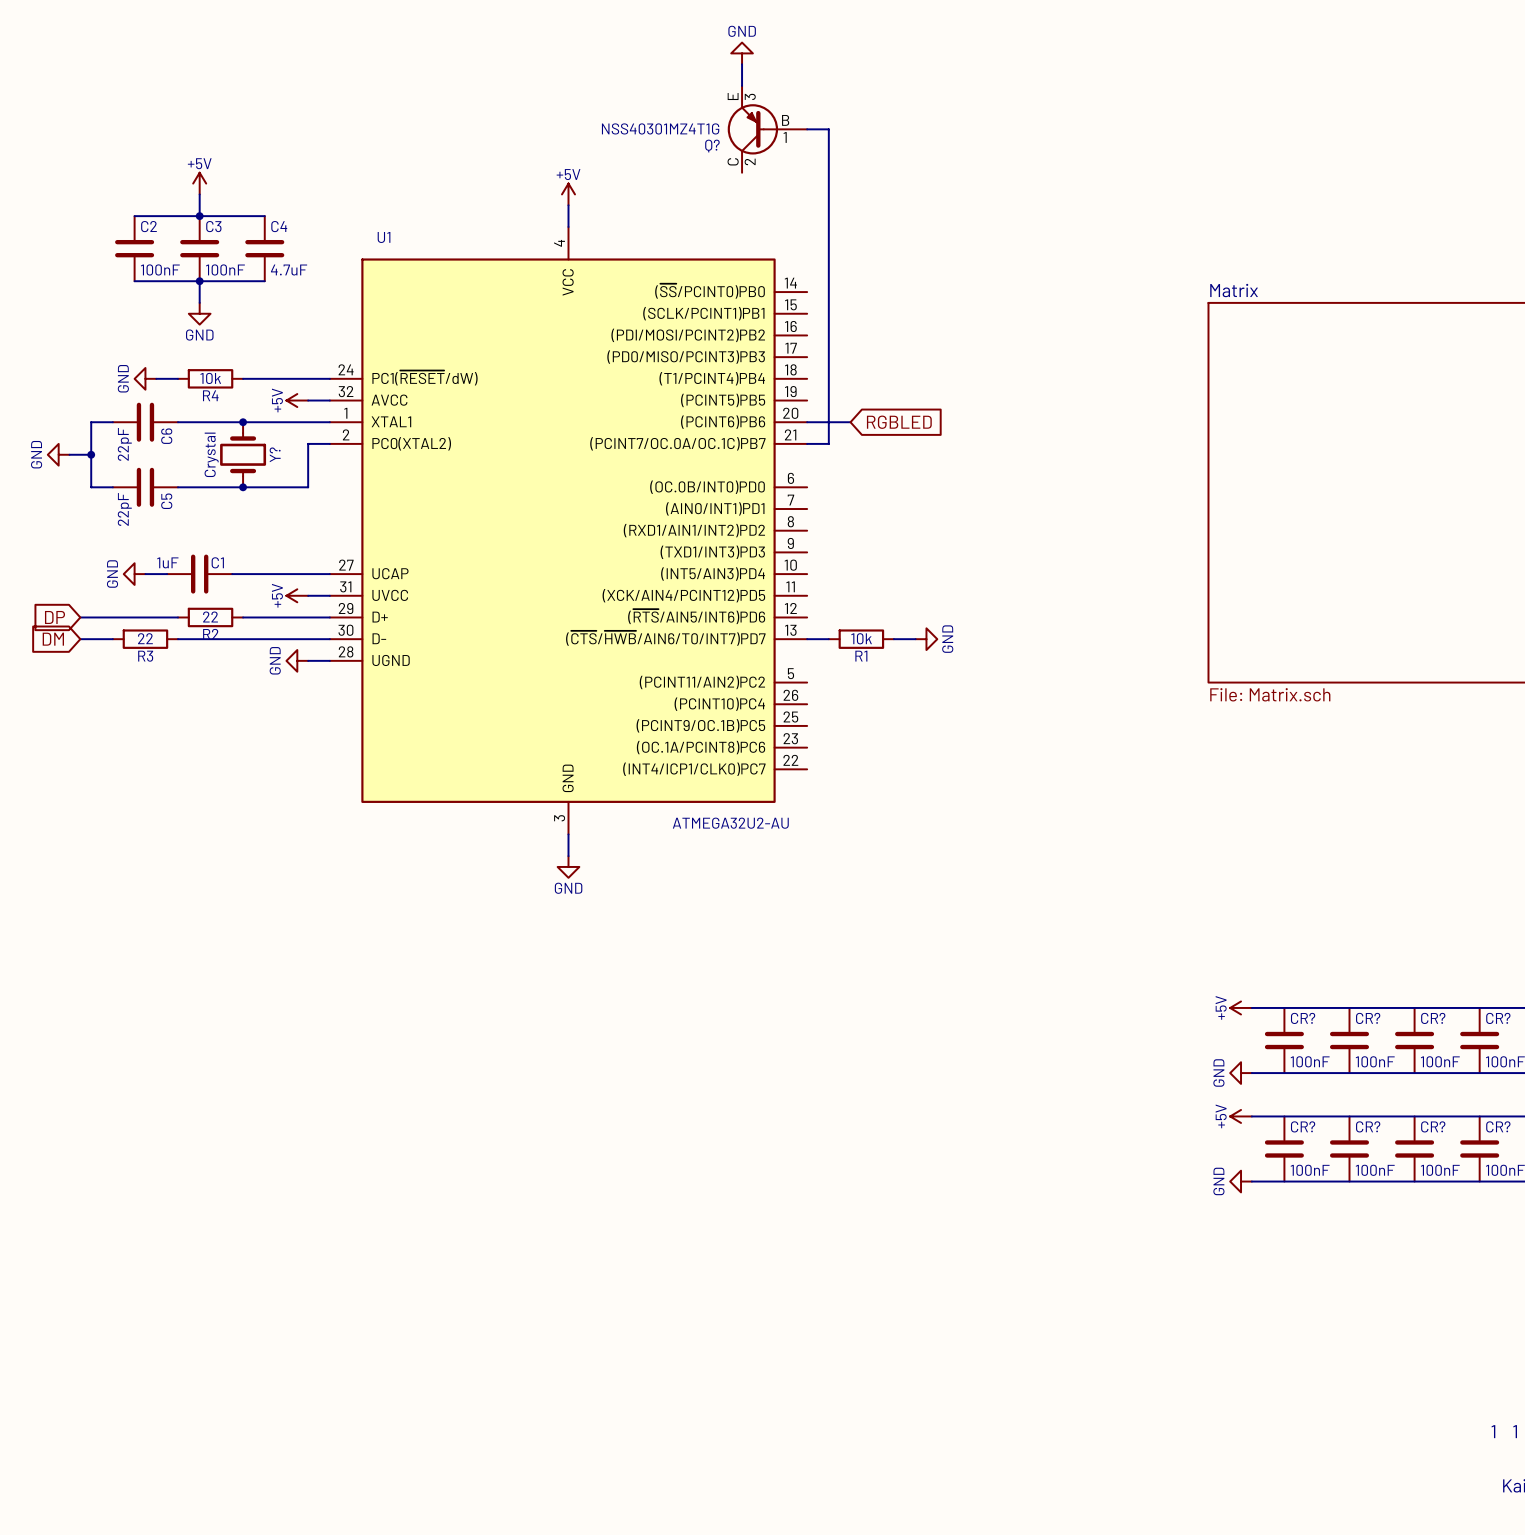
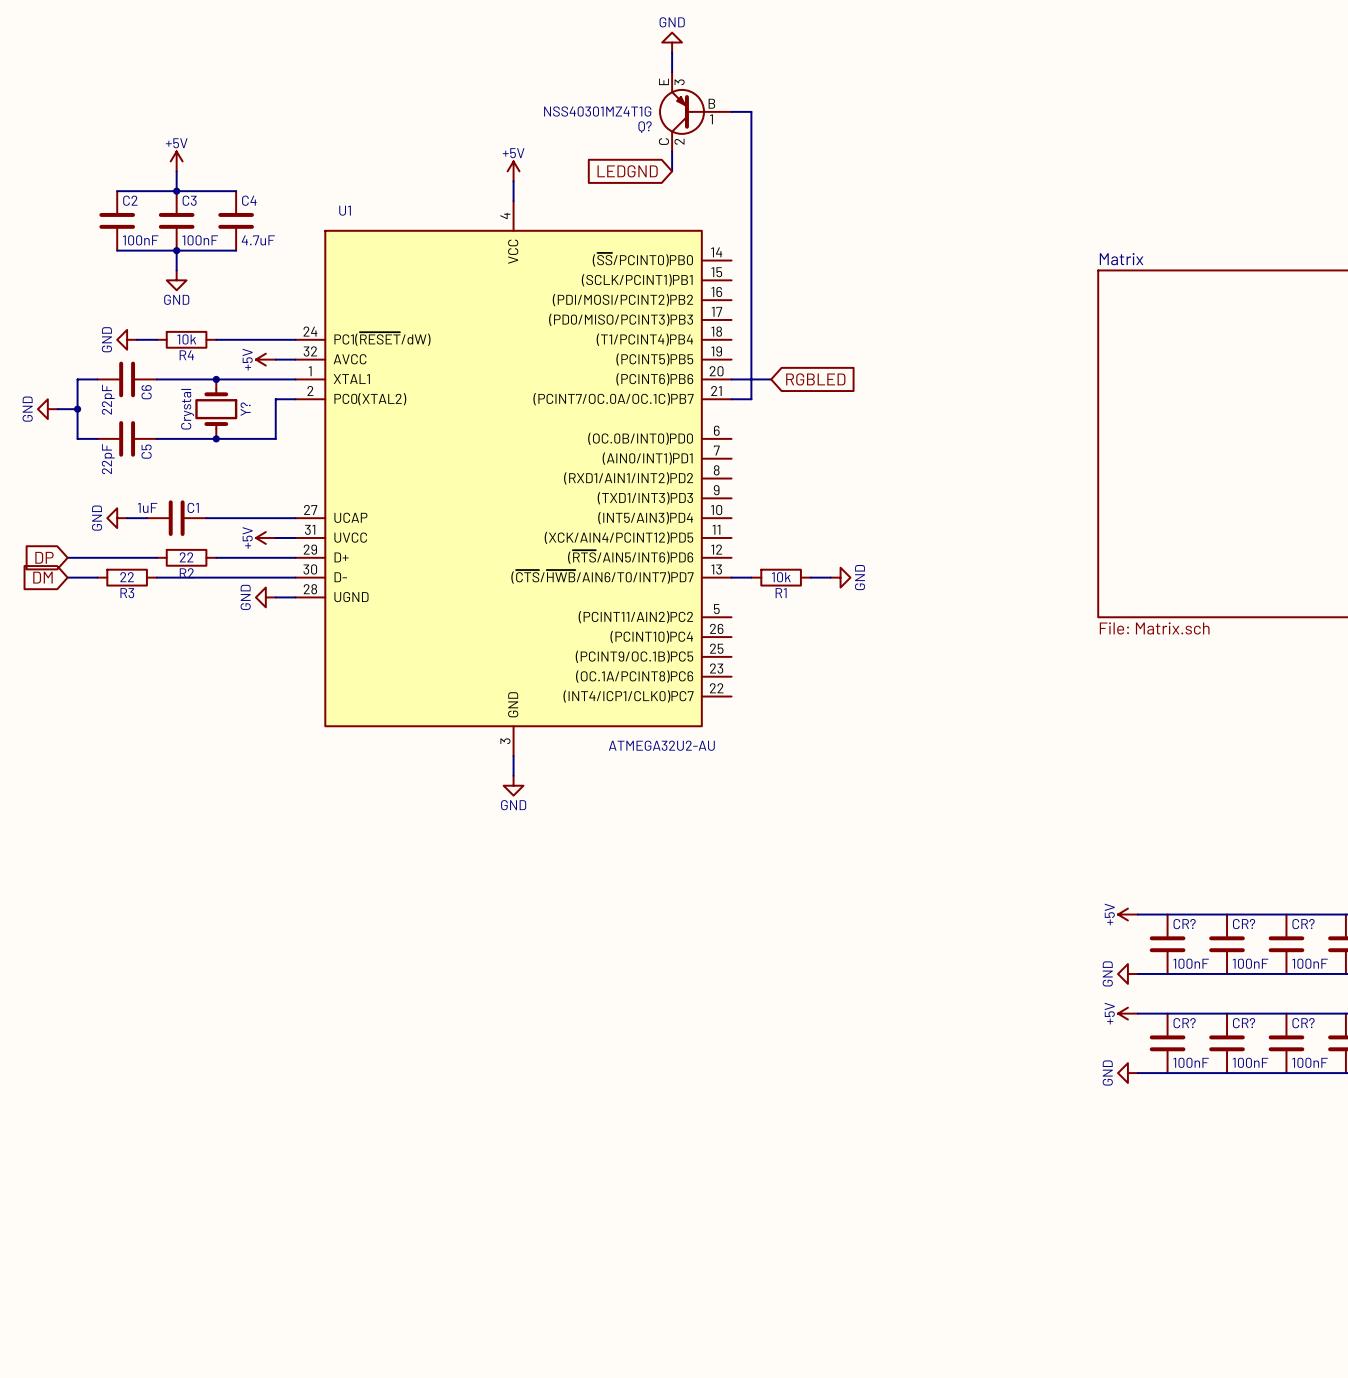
wire: none -> (672, 151) (672, 171)
global label: none -> LEDGND (627, 171)

